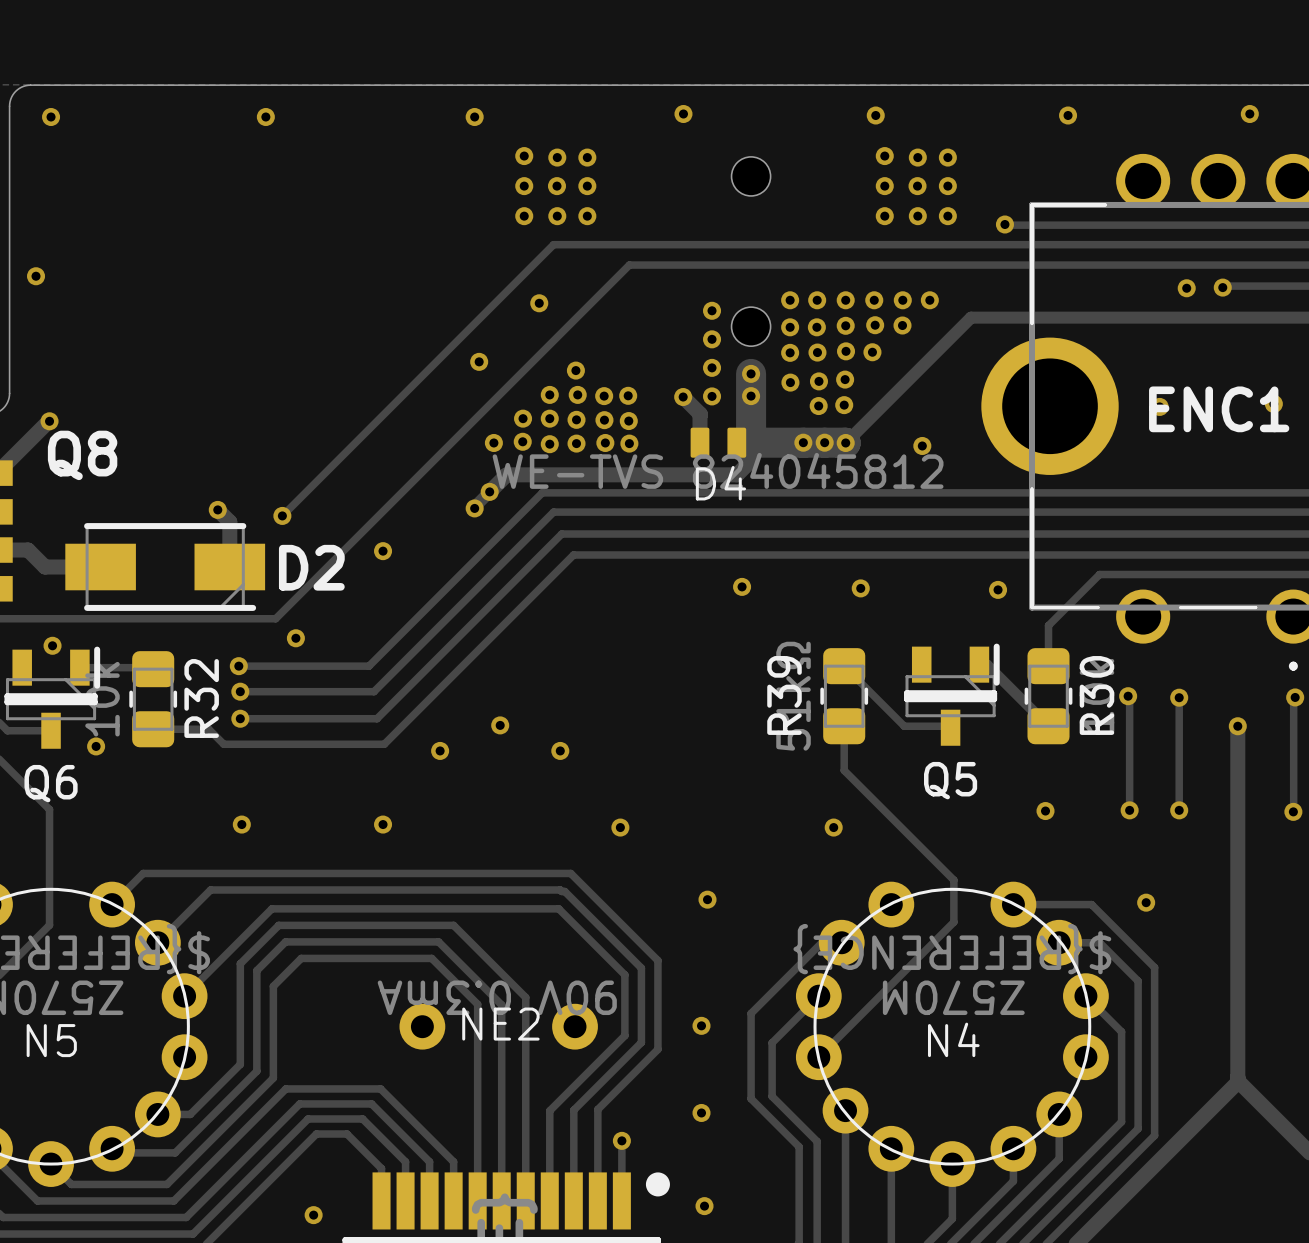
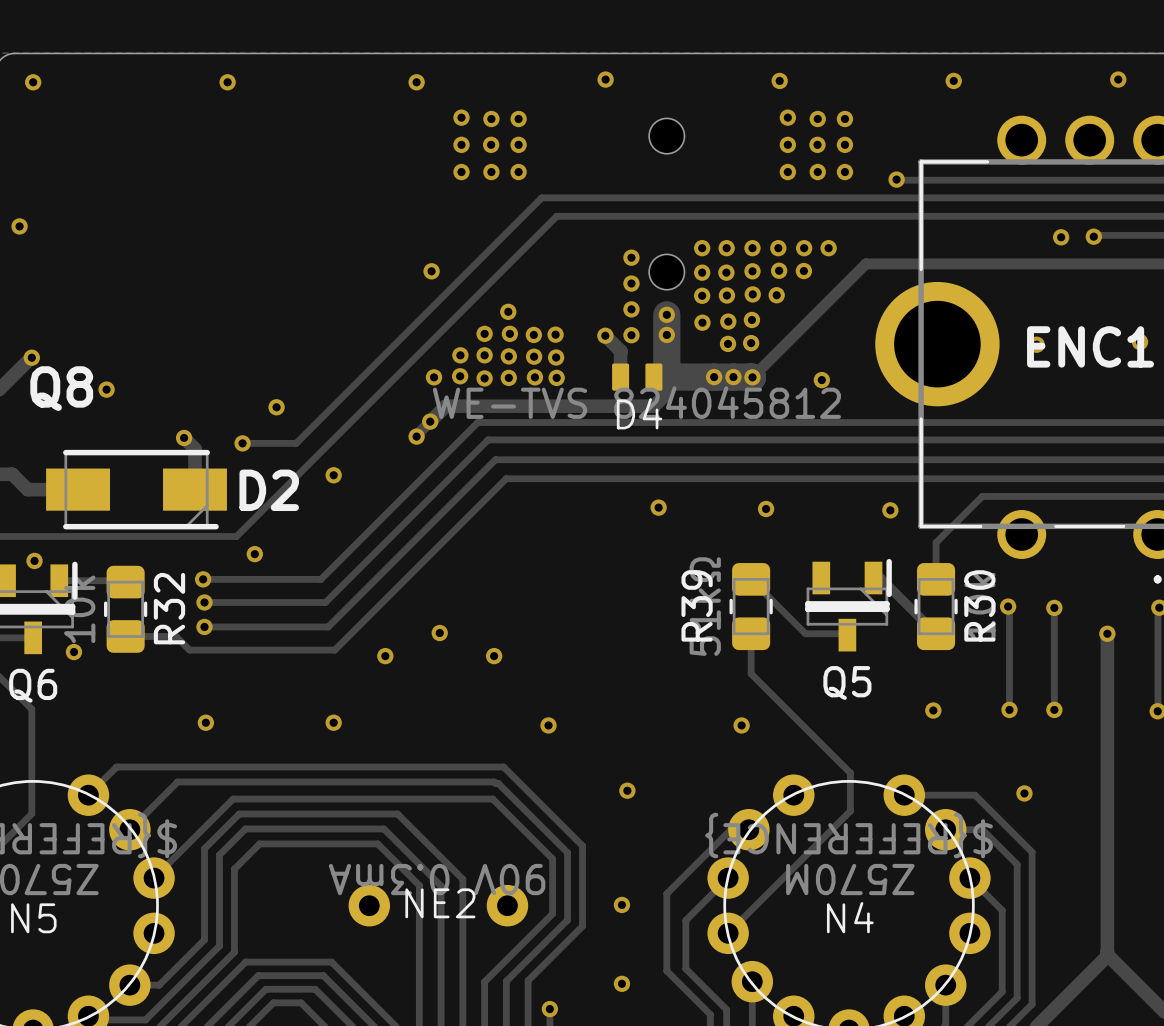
track: (612, 244) (553, 244) (282, 515) -> (541, 197) (296, 443) (242, 443)
via: (539, 303) -> none
via: none -> (431, 271)
via: (479, 361) -> none
via: none -> (106, 389)
via: none -> (276, 407)

